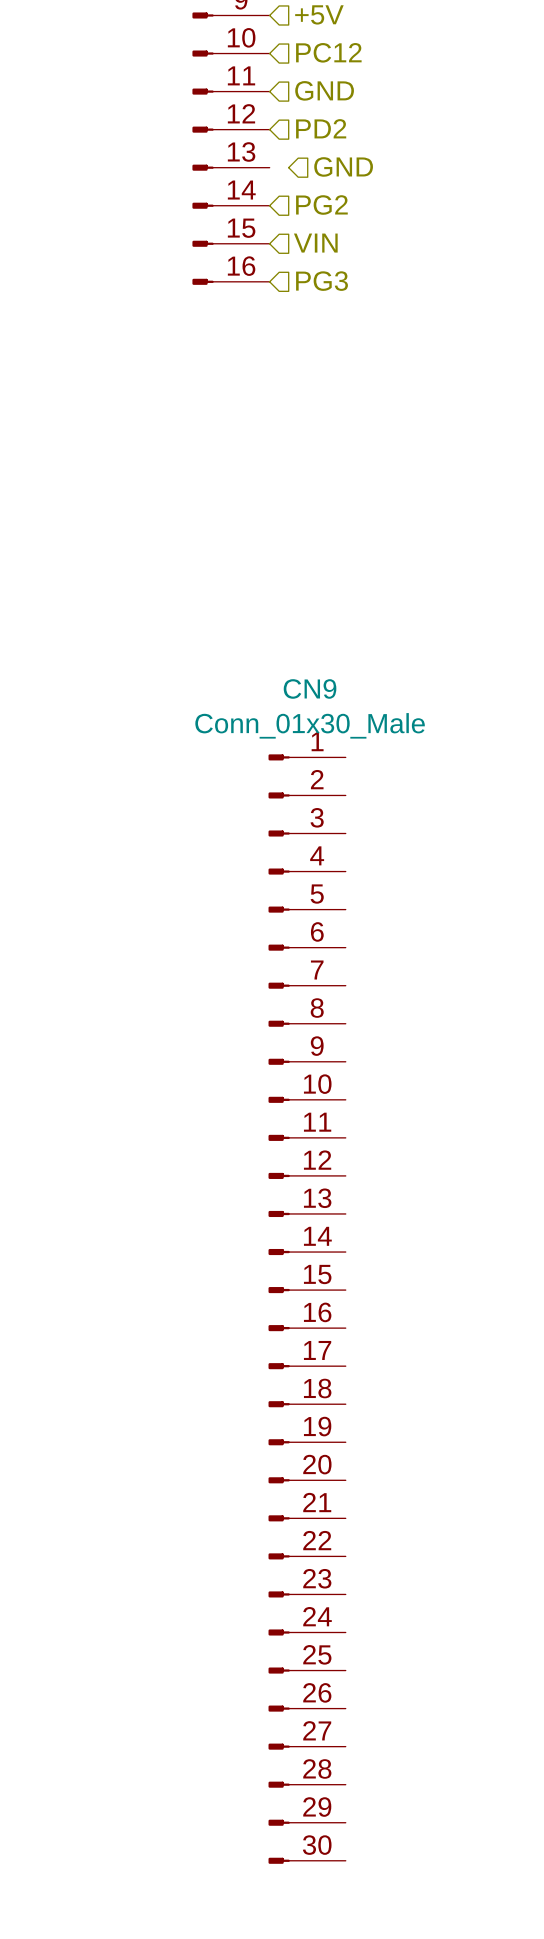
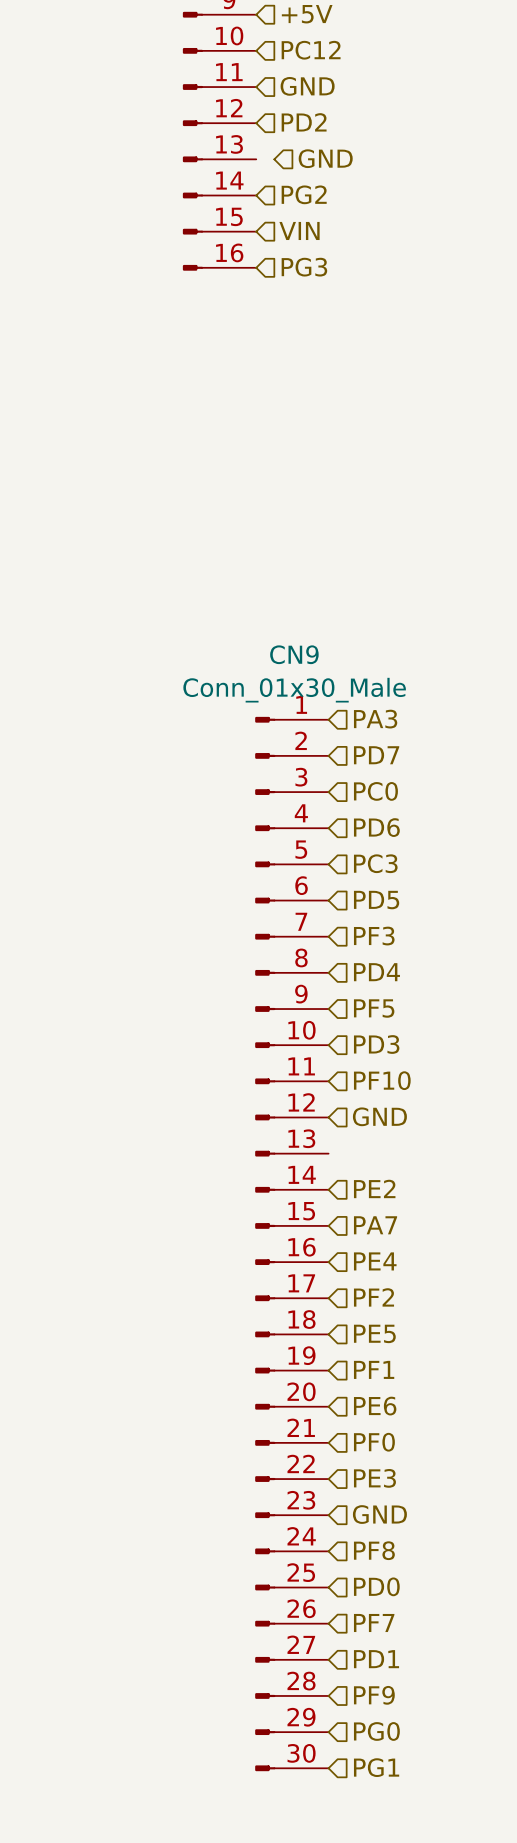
hierarchical label: none -> PA3 (375, 719)
hierarchical label: none -> PD7 (376, 755)
hierarchical label: none -> PC0 (375, 791)
hierarchical label: none -> PD6 (376, 827)
hierarchical label: none -> PC3 (375, 863)
hierarchical label: none -> PD5 (376, 900)
hierarchical label: none -> PF3 (374, 936)
hierarchical label: none -> PD4 (376, 972)
hierarchical label: none -> PF5 (374, 1008)
hierarchical label: none -> PD3 (376, 1044)
hierarchical label: none -> PF10 (382, 1080)
hierarchical label: none -> GND (379, 1116)
hierarchical label: none -> PE2 (374, 1188)
hierarchical label: none -> PA7 (375, 1225)
hierarchical label: none -> PE4 (375, 1261)
hierarchical label: none -> PF2 (374, 1297)
hierarchical label: none -> PE5 (374, 1333)
hierarchical label: none -> PF1 (374, 1369)
hierarchical label: none -> PE6 (375, 1406)
hierarchical label: none -> PF0 (374, 1442)
hierarchical label: none -> PE3 (374, 1478)
hierarchical label: none -> GND (379, 1514)
hierarchical label: none -> PF8 (374, 1550)
hierarchical label: none -> PD0 (376, 1586)
hierarchical label: none -> PF7 (374, 1622)
hierarchical label: none -> PD1 (376, 1659)
hierarchical label: none -> PF9 (374, 1695)
hierarchical label: none -> PG0 (376, 1731)
hierarchical label: none -> PG1 (376, 1767)

